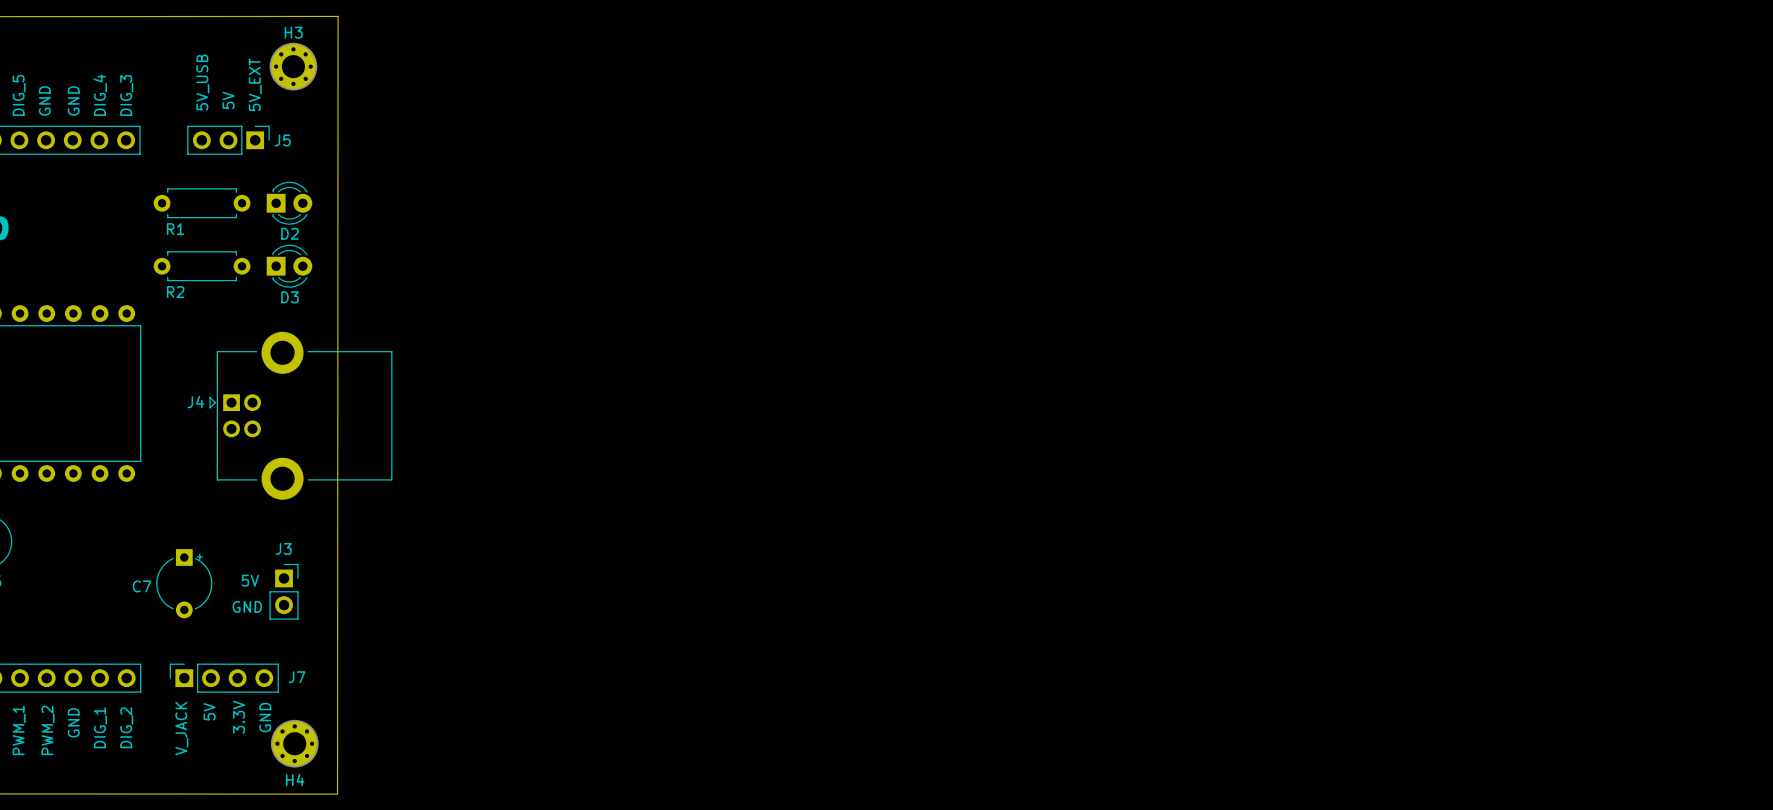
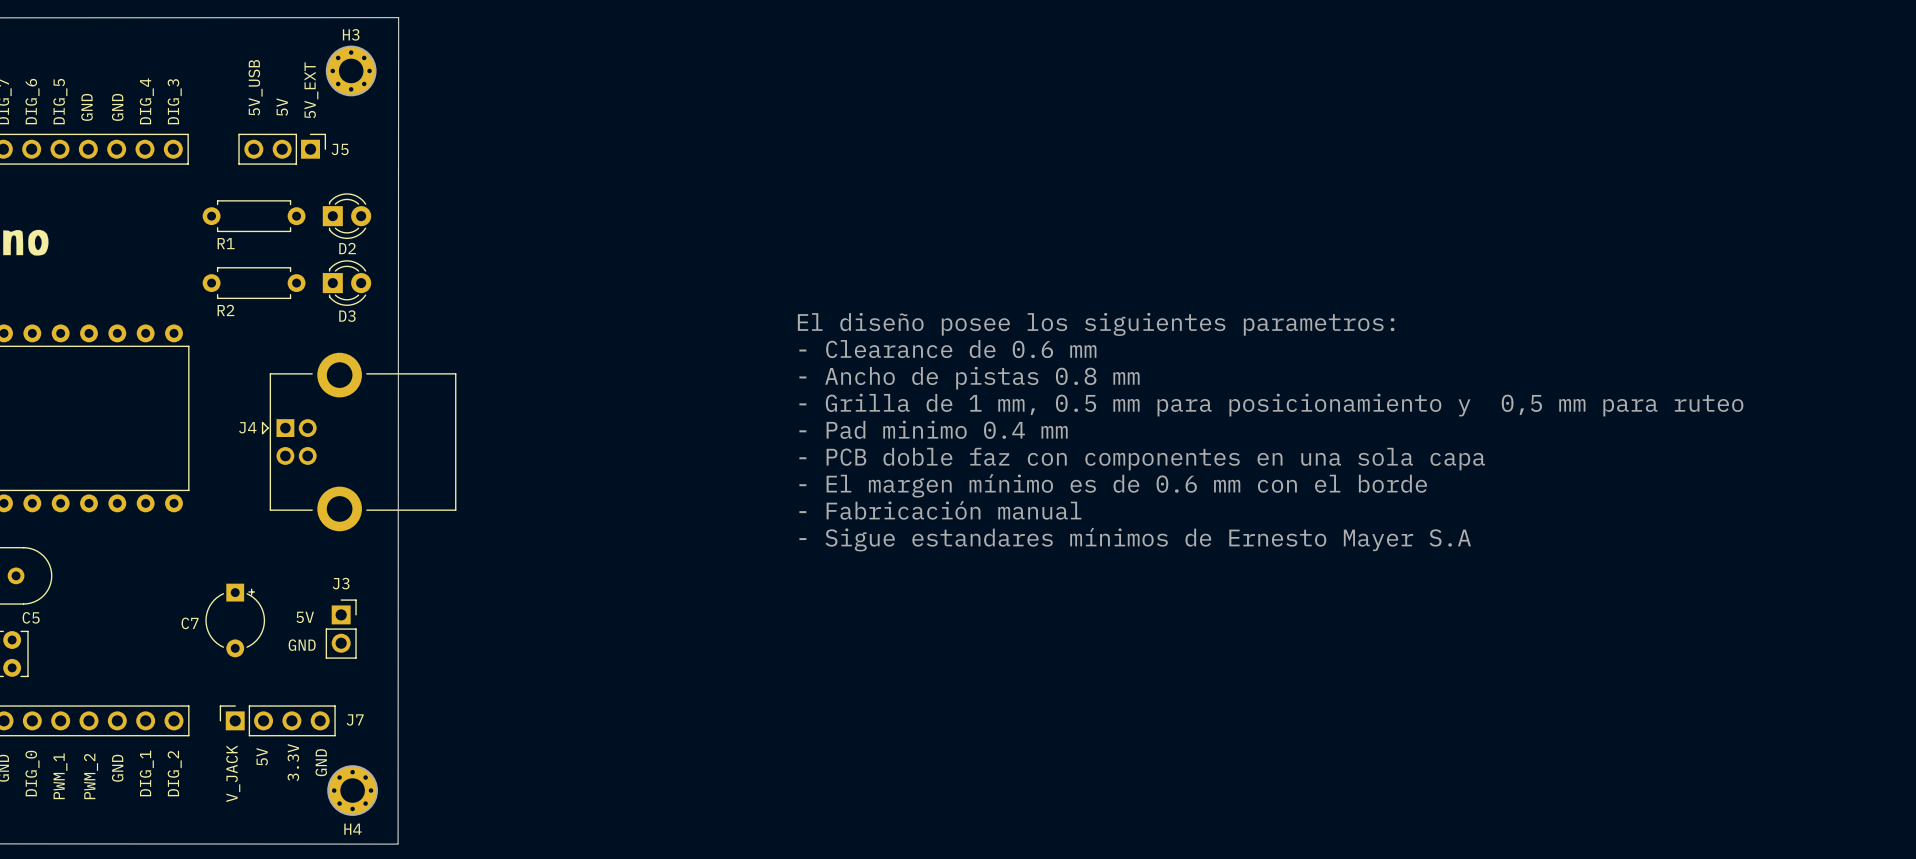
text: none -> El diseño posee los siguientes parametros: (1096, 324)
text: none -> - Clearance de 0.6 mm (947, 349)
text: none -> - Ancho de pistas 0.8 mm (969, 378)
text: none -> - Grilla de 1 mm, 0.5 mm para posicionamiento y 0,5 mm para ruteo (1271, 405)
text: none -> - Pad minimo 0.4 mm (933, 429)
text: none -> - PCB doble faz con componentes en una sola capa (1142, 459)
text: none -> - El margen mínimo es de 0.6 mm con el borde (1113, 485)
text: none -> - Fabricación manual (940, 510)
text: none -> - Sigue estandares mínimos de Ernesto Mayer S.A (1135, 539)

